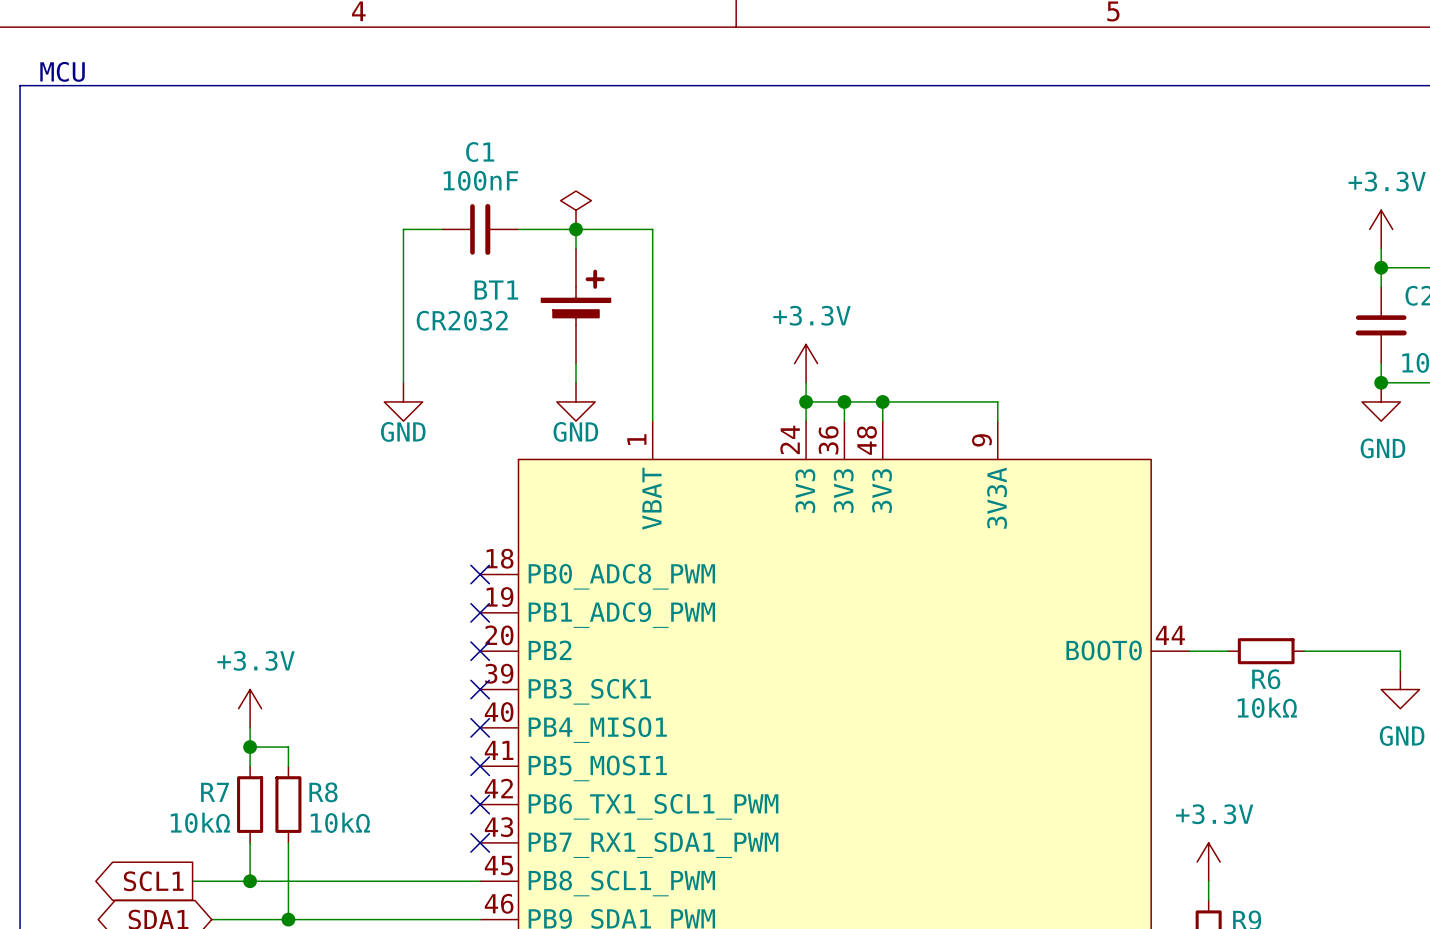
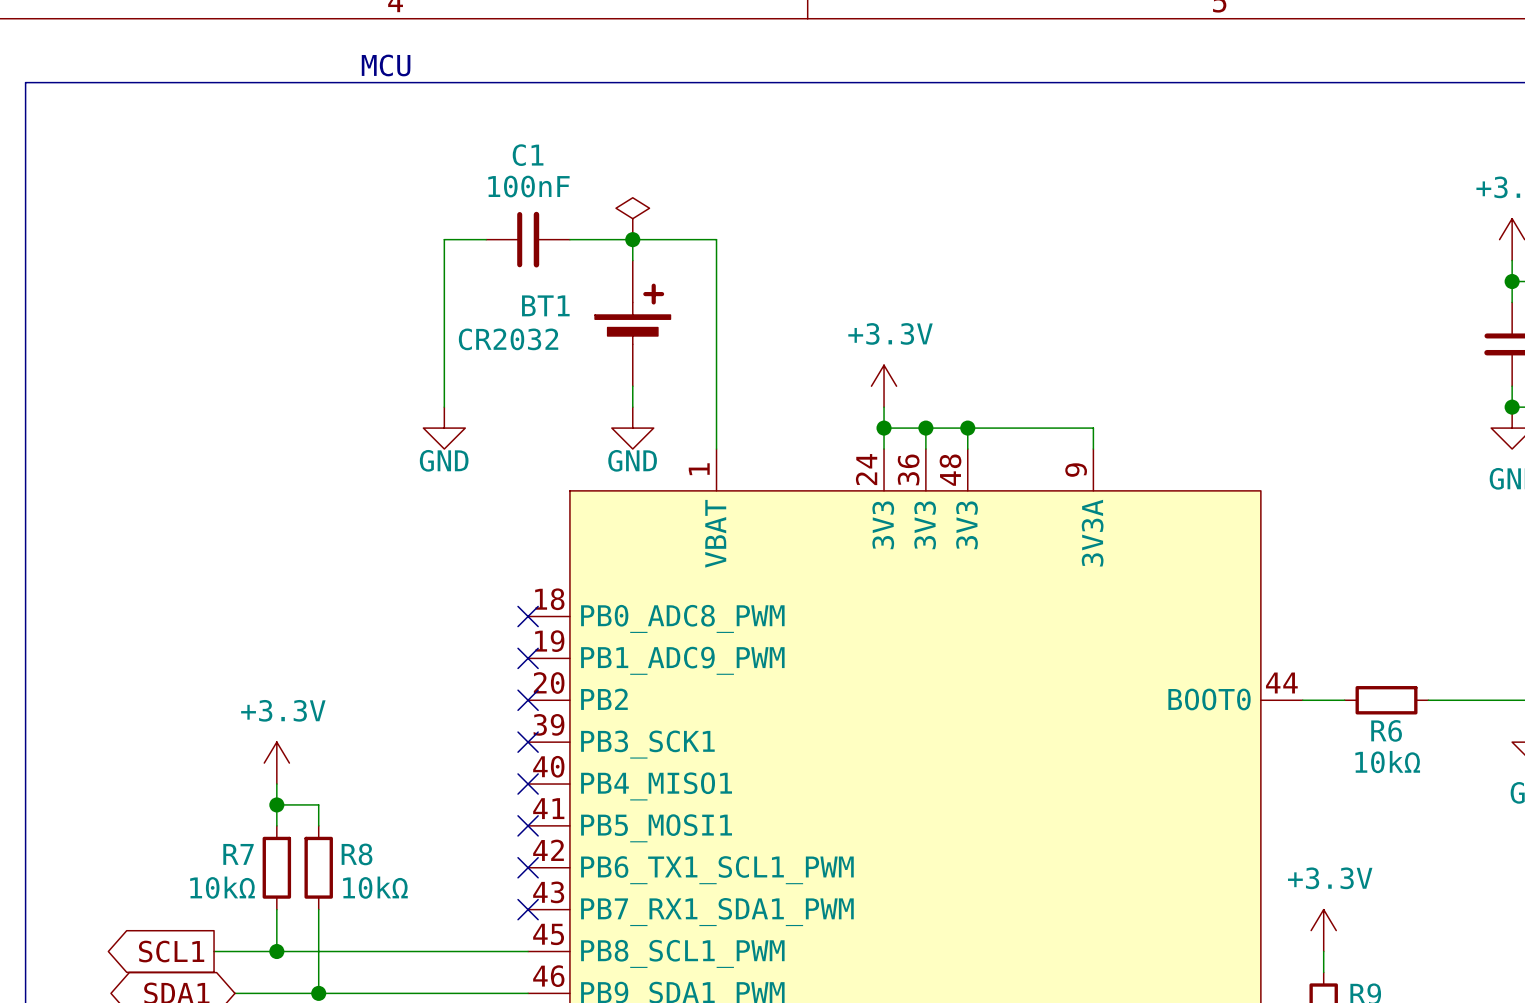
text position: MCU (62, 71) -> MCU (386, 65)

